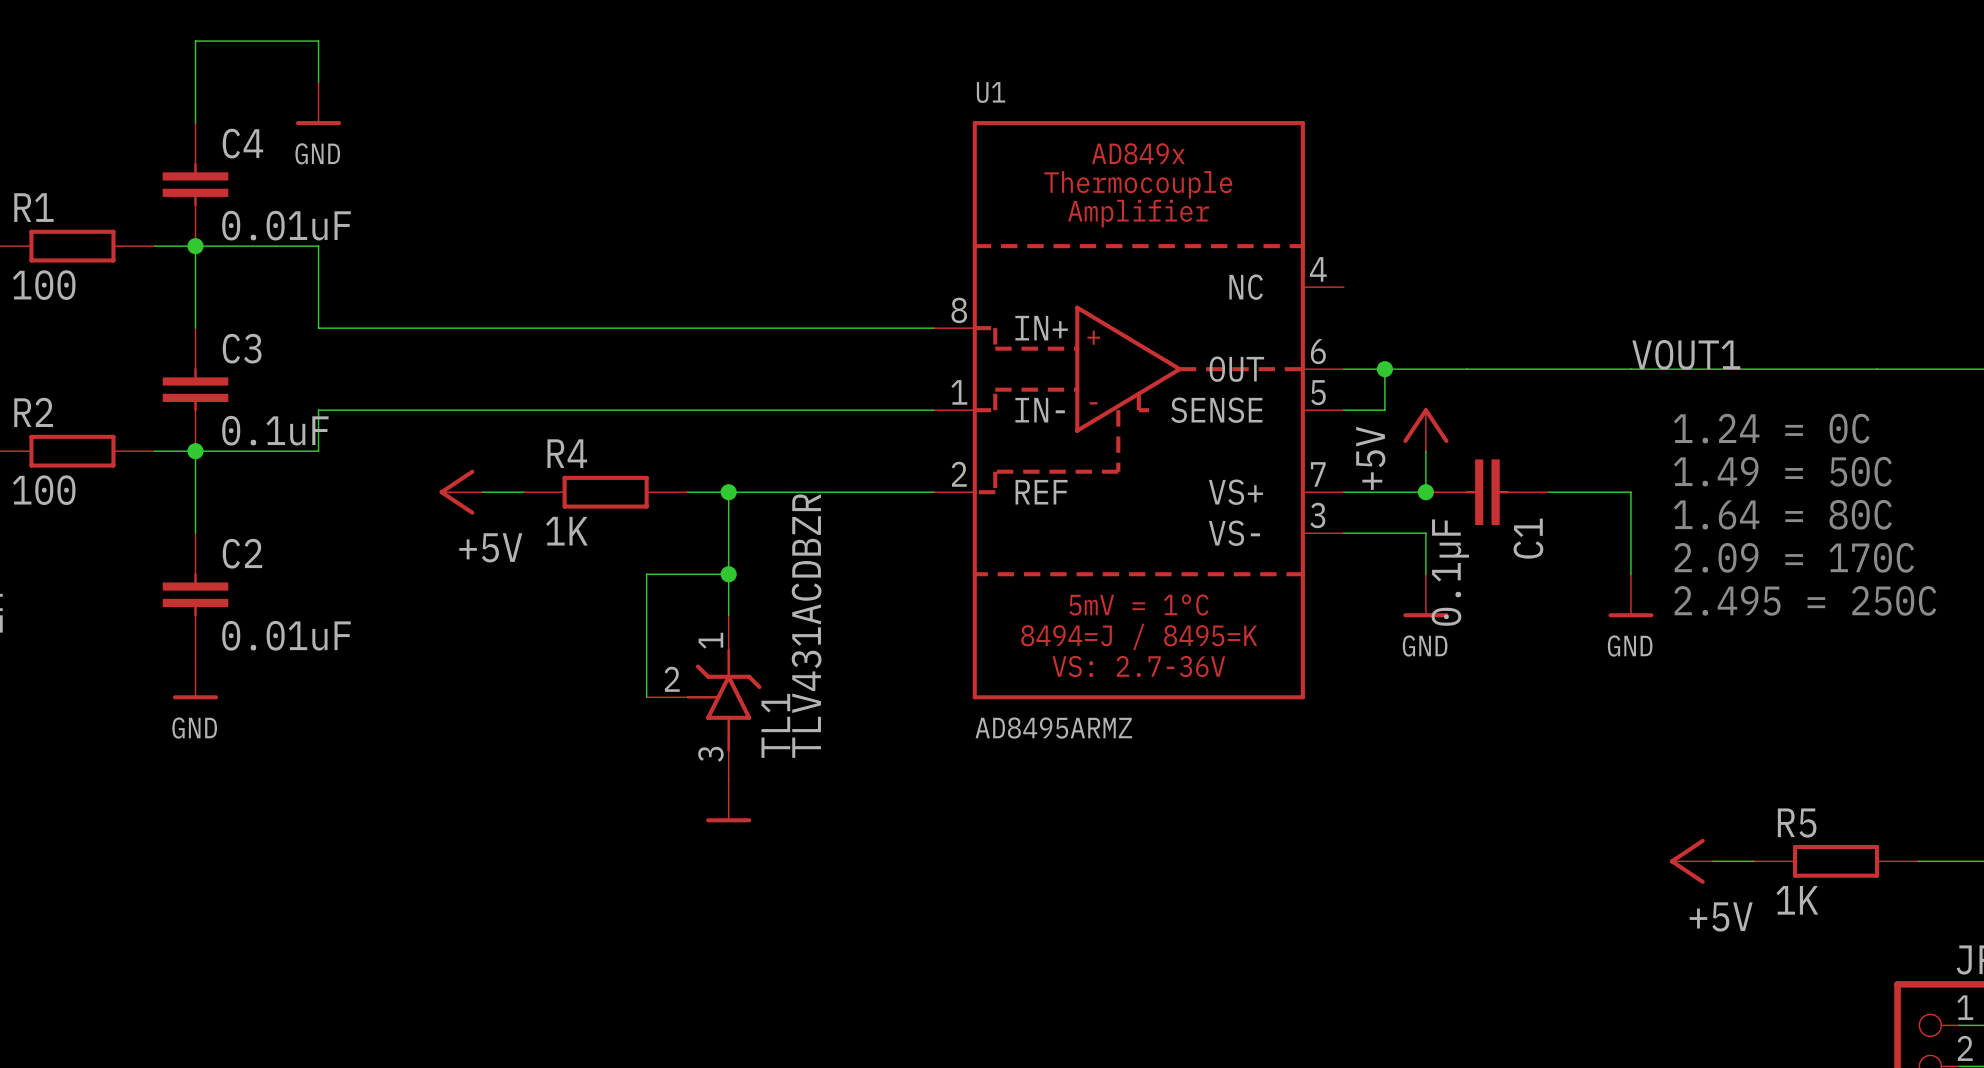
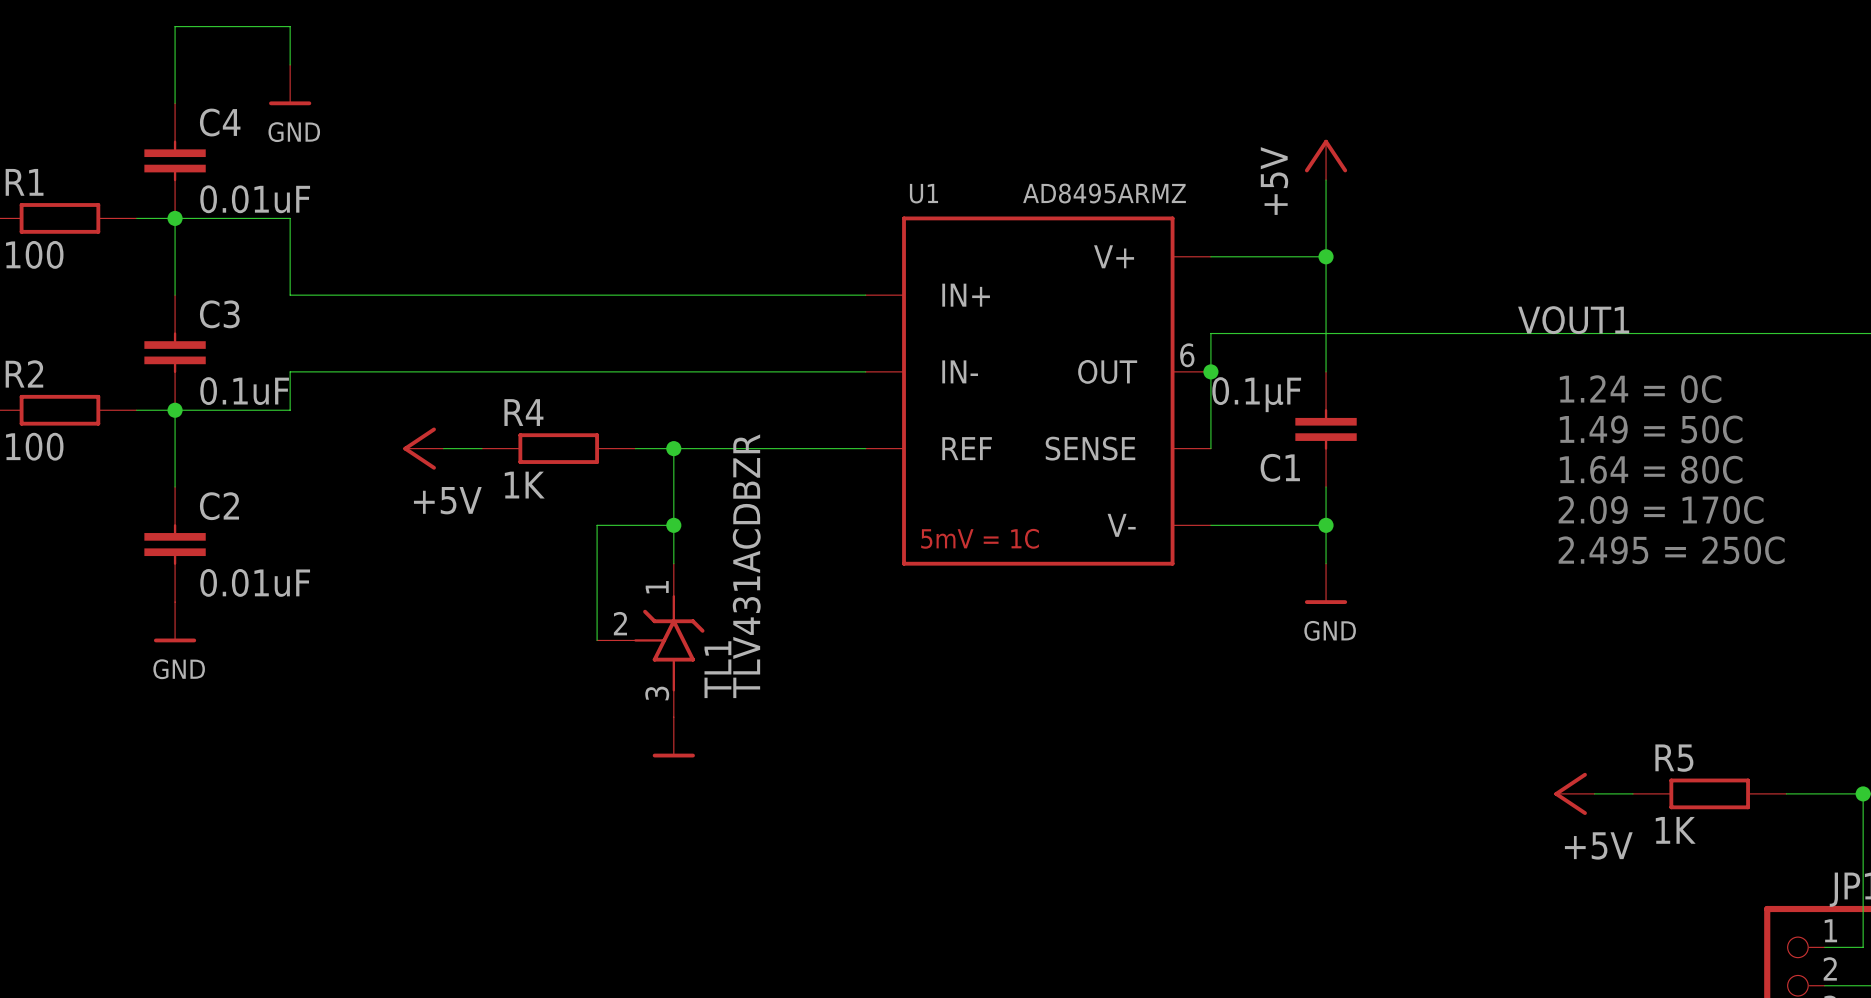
U1 name position: U1 (991, 92) -> U1 (923, 193)
U1 symbol: [933, 121, 1344, 700] -> [865, 216, 1211, 566]
wire: none -> (1326, 180) (1326, 371)
wire: none -> (1210, 256) (1326, 256)
junction: none -> (1326, 256)
wire: (1384, 369) (1384, 410) (1343, 410) -> none
junction: (1384, 369) -> none
junction: none -> (1210, 371)
power symbol position: +5V (1425, 429) -> +5V (1326, 159)
wire: (1425, 451) (1425, 492) (1343, 492) -> none
junction: (1425, 492) -> none
C1 rotation: 0° (1487, 492) -> 90° clockwise (1326, 429)
wire: (1548, 492) (1630, 492) (1630, 574) -> none
wire: (1343, 533) (1425, 533) -> none
wire: none -> (1210, 525) (1326, 525) (1326, 563)
junction: none -> (1326, 525)
power symbol position: GND (1425, 595) -> GND (1326, 583)
power symbol: GND (1630, 595) -> none
U1 value position: AD8495ARMZ (1053, 728) -> AD8495ARMZ (1104, 193)

